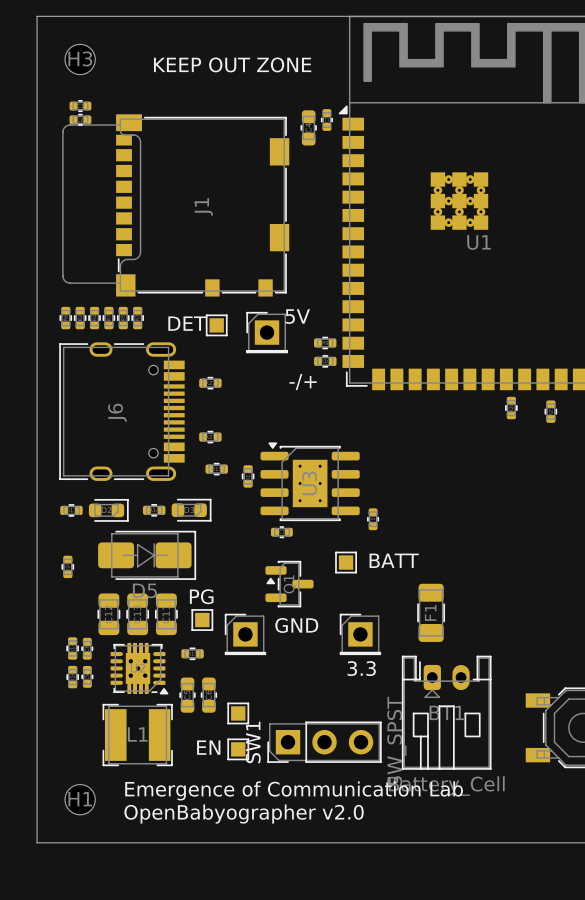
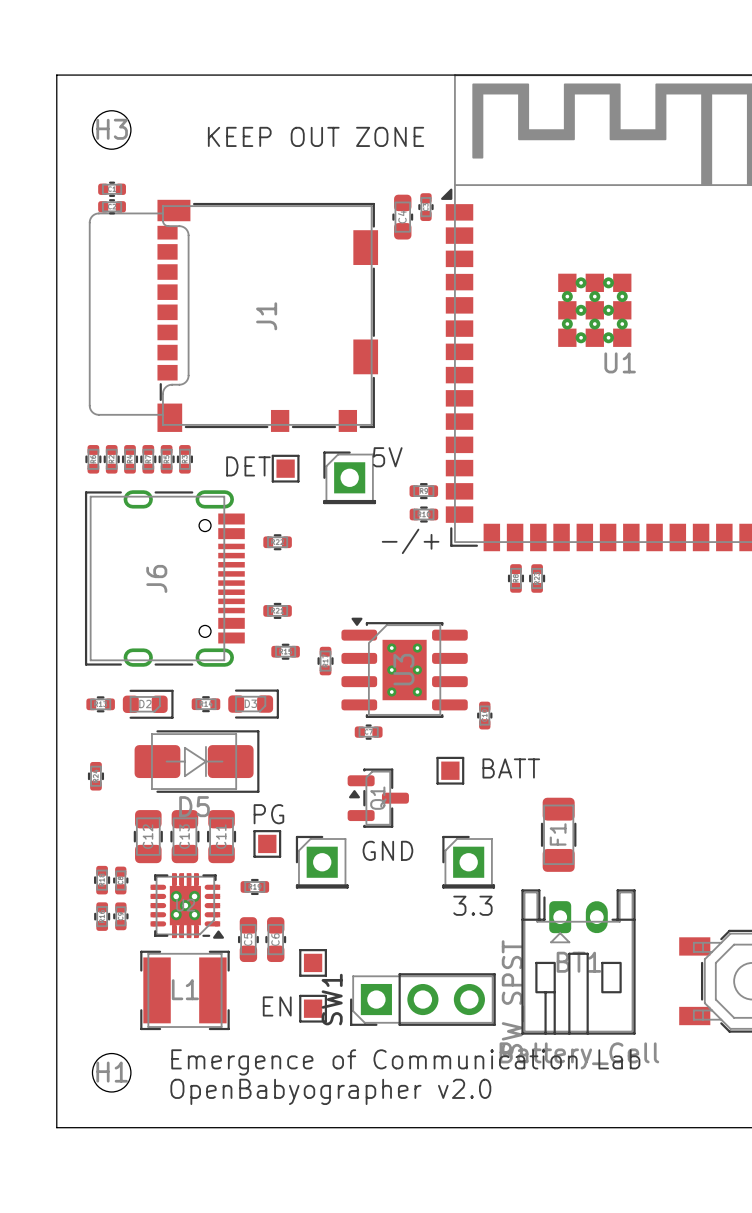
part: (511, 408) -> none
part: none -> (515, 578)
part position: (550, 411) -> (537, 578)

